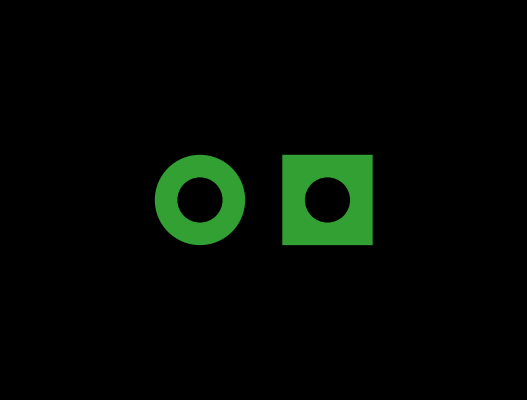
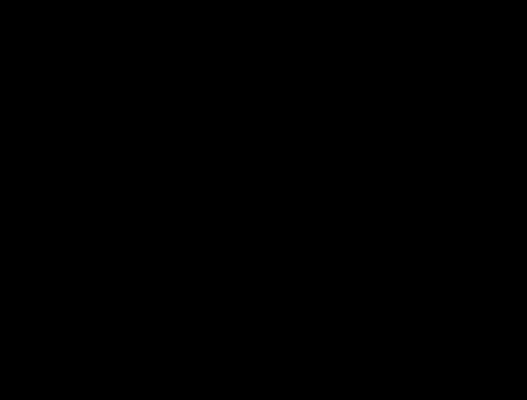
part: (263, 199) -> none

